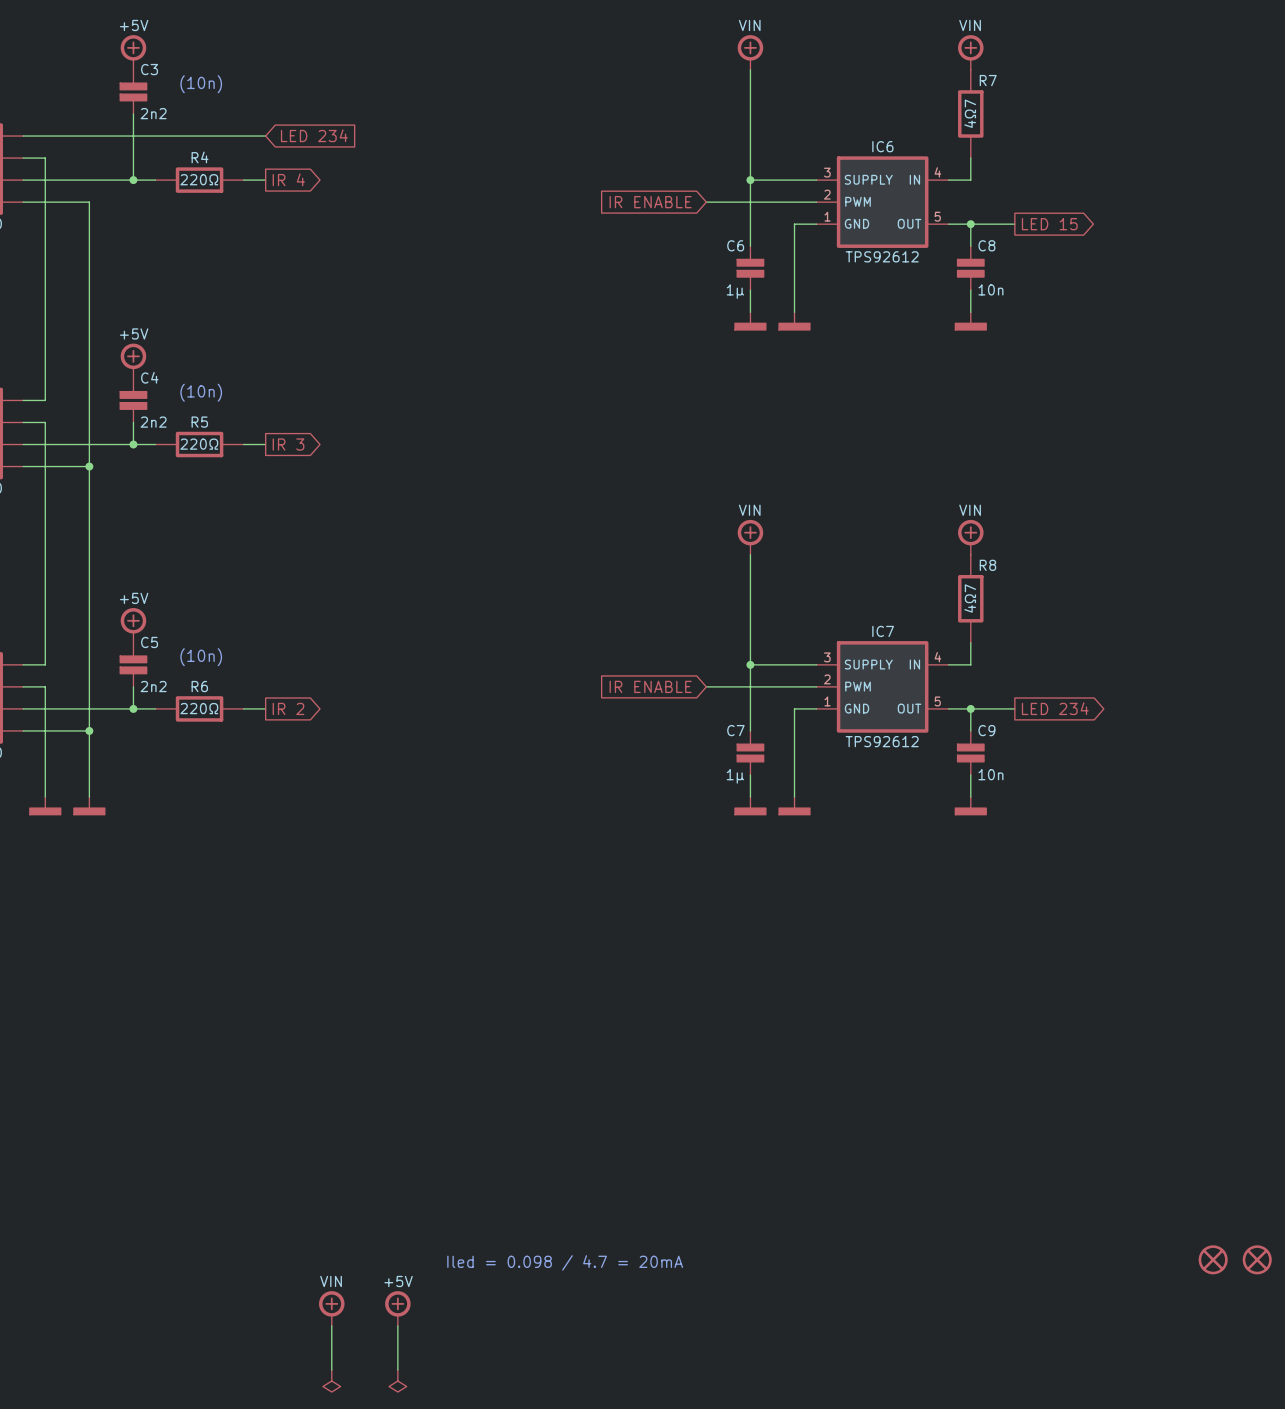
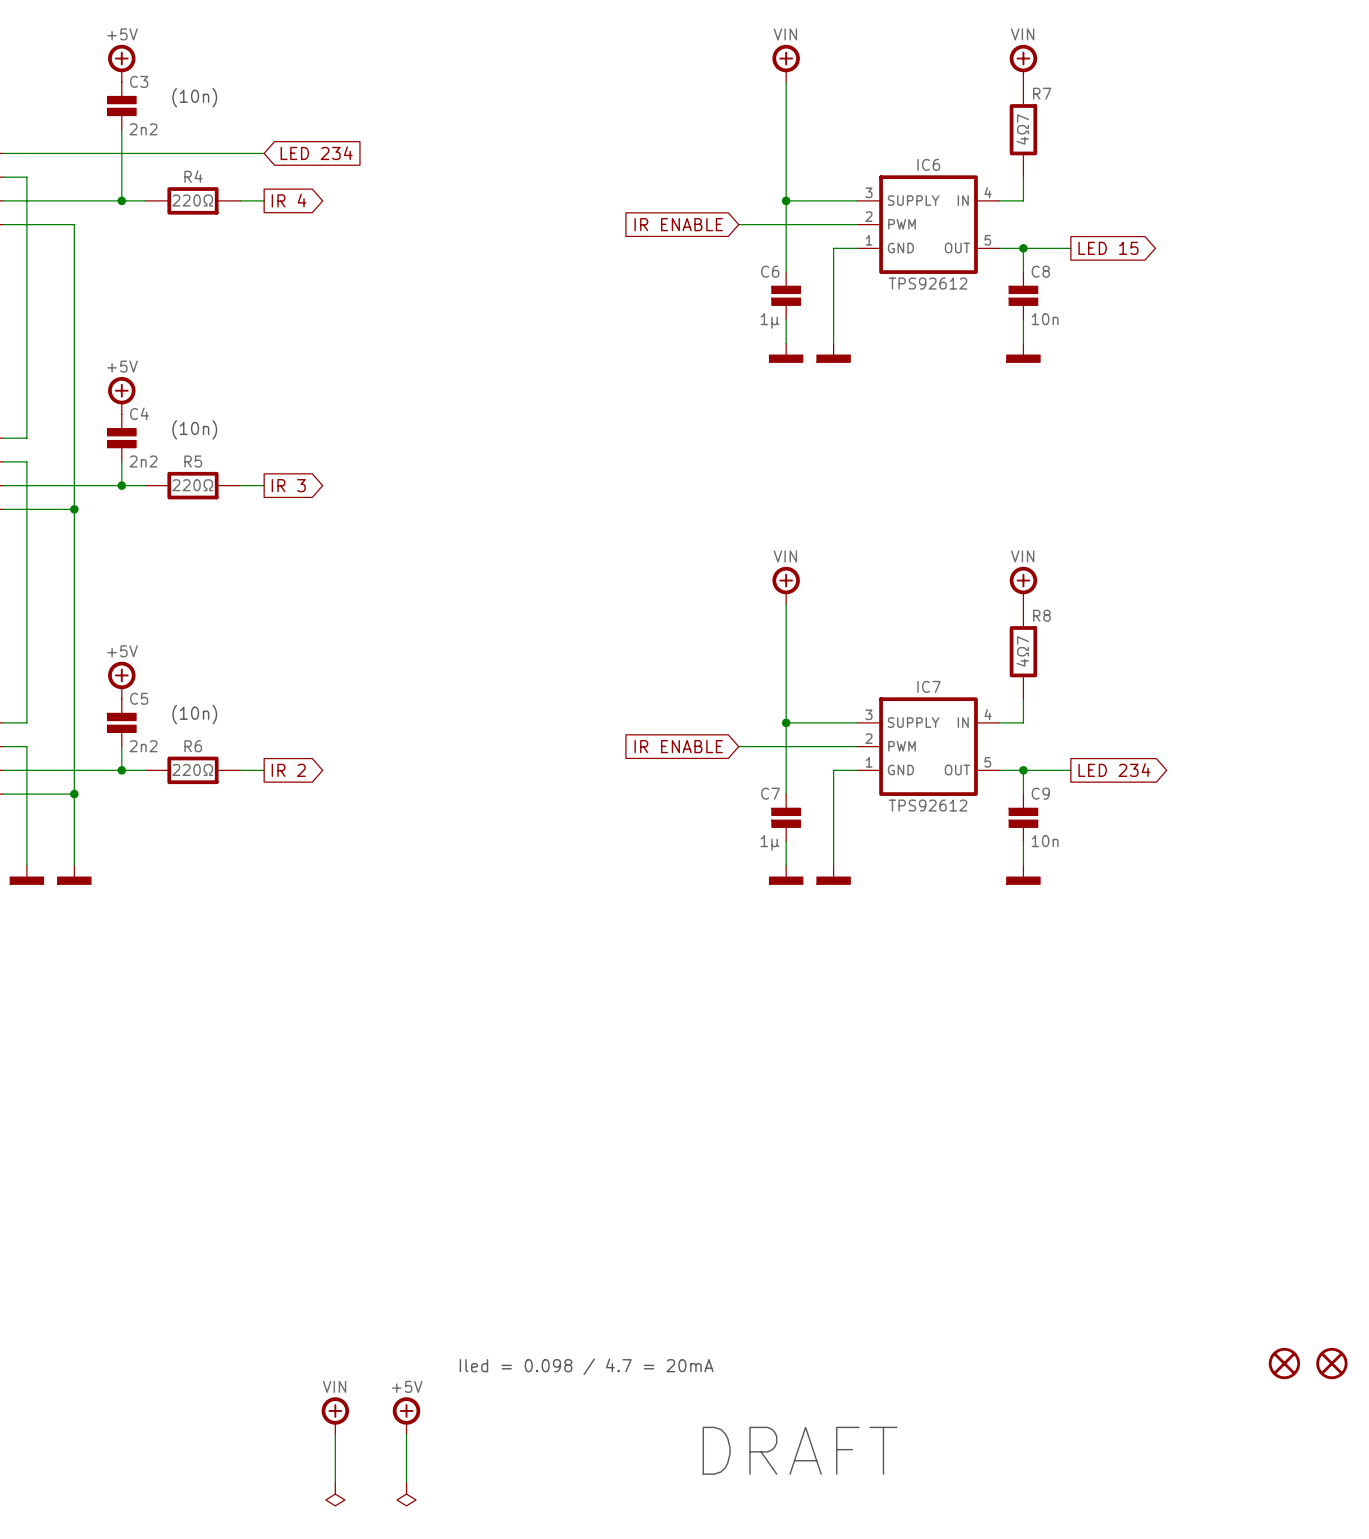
text: none -> DRAFT (800, 1450)

